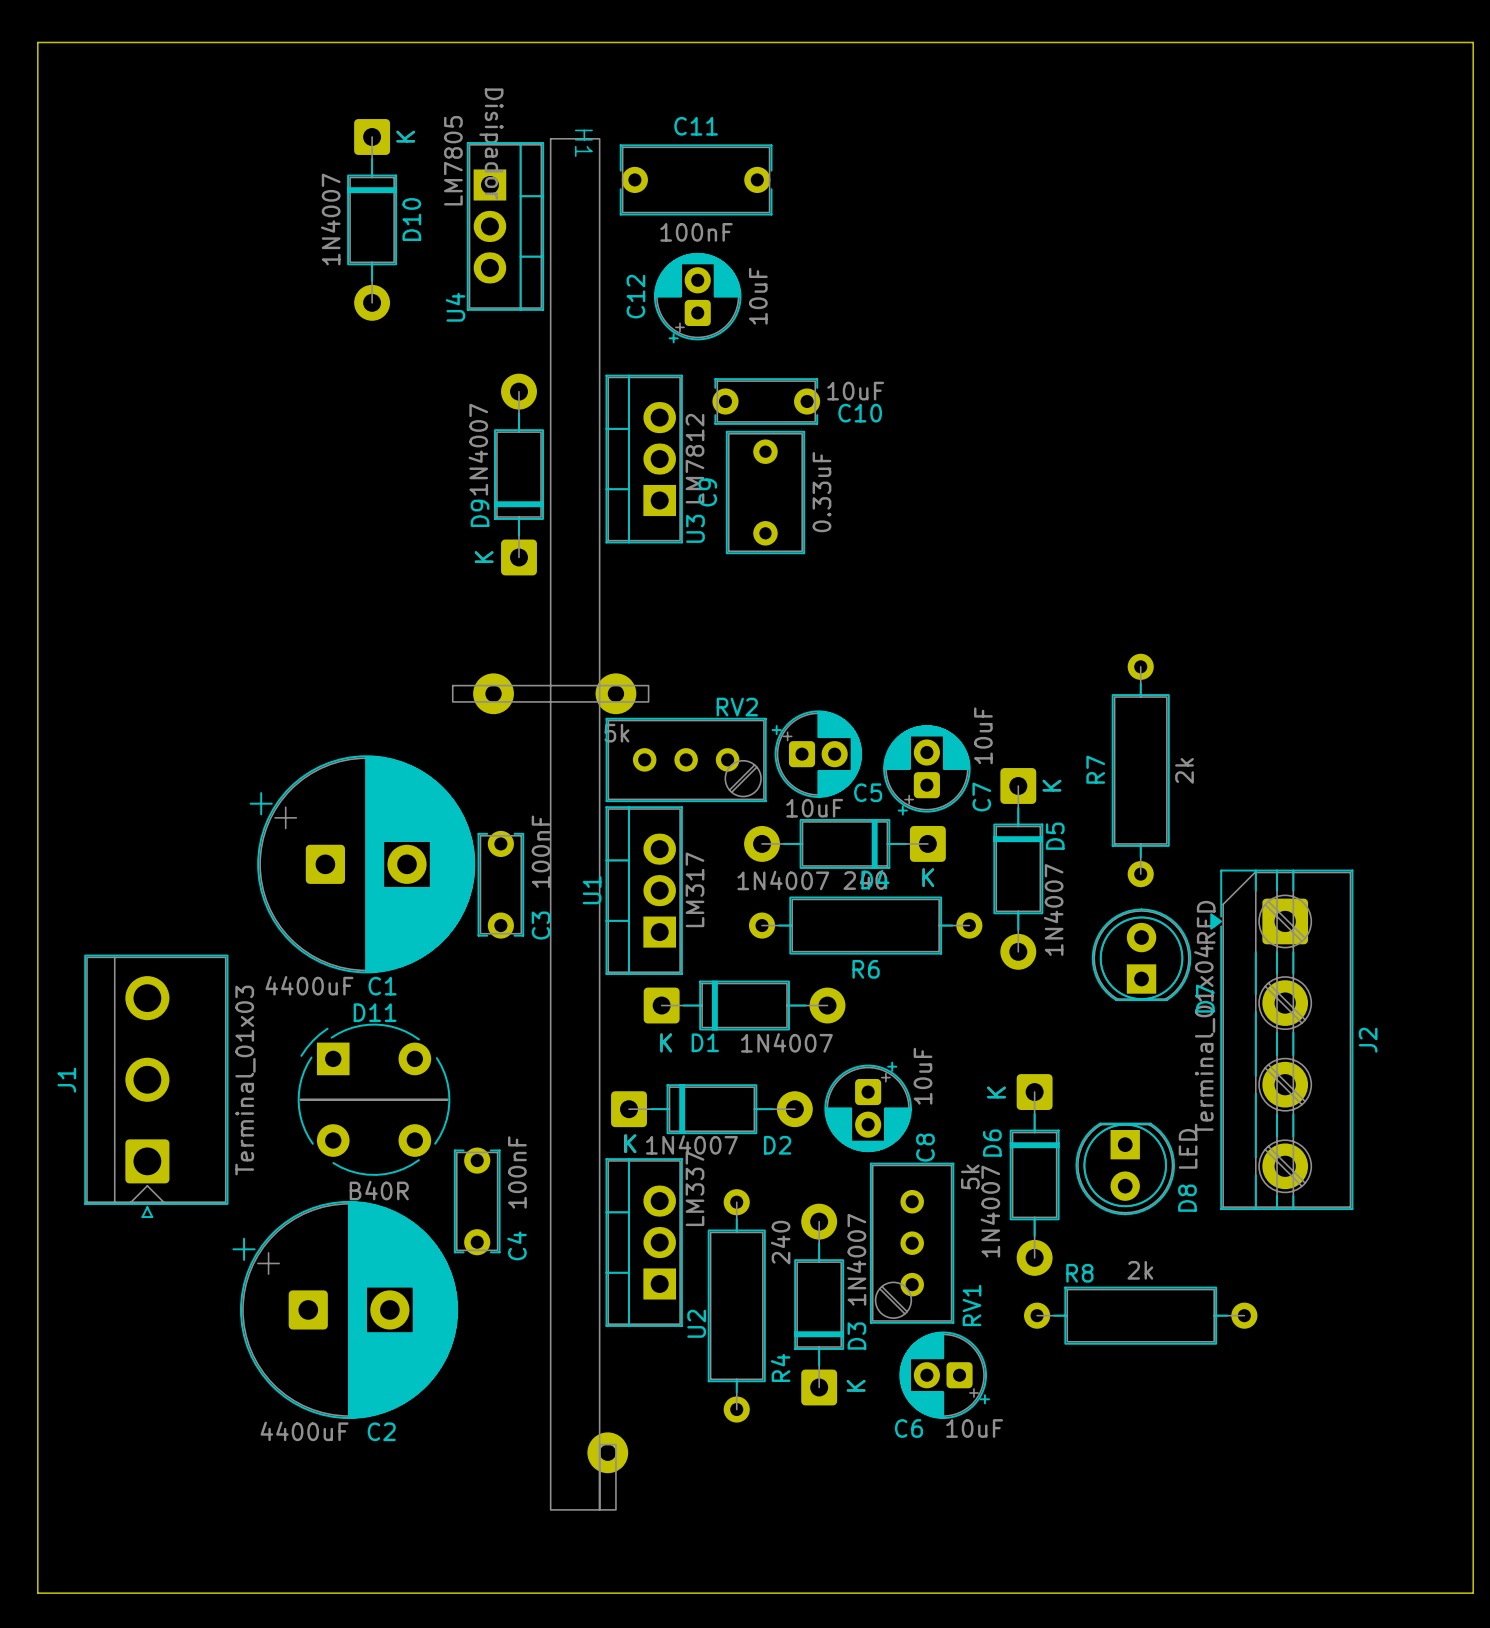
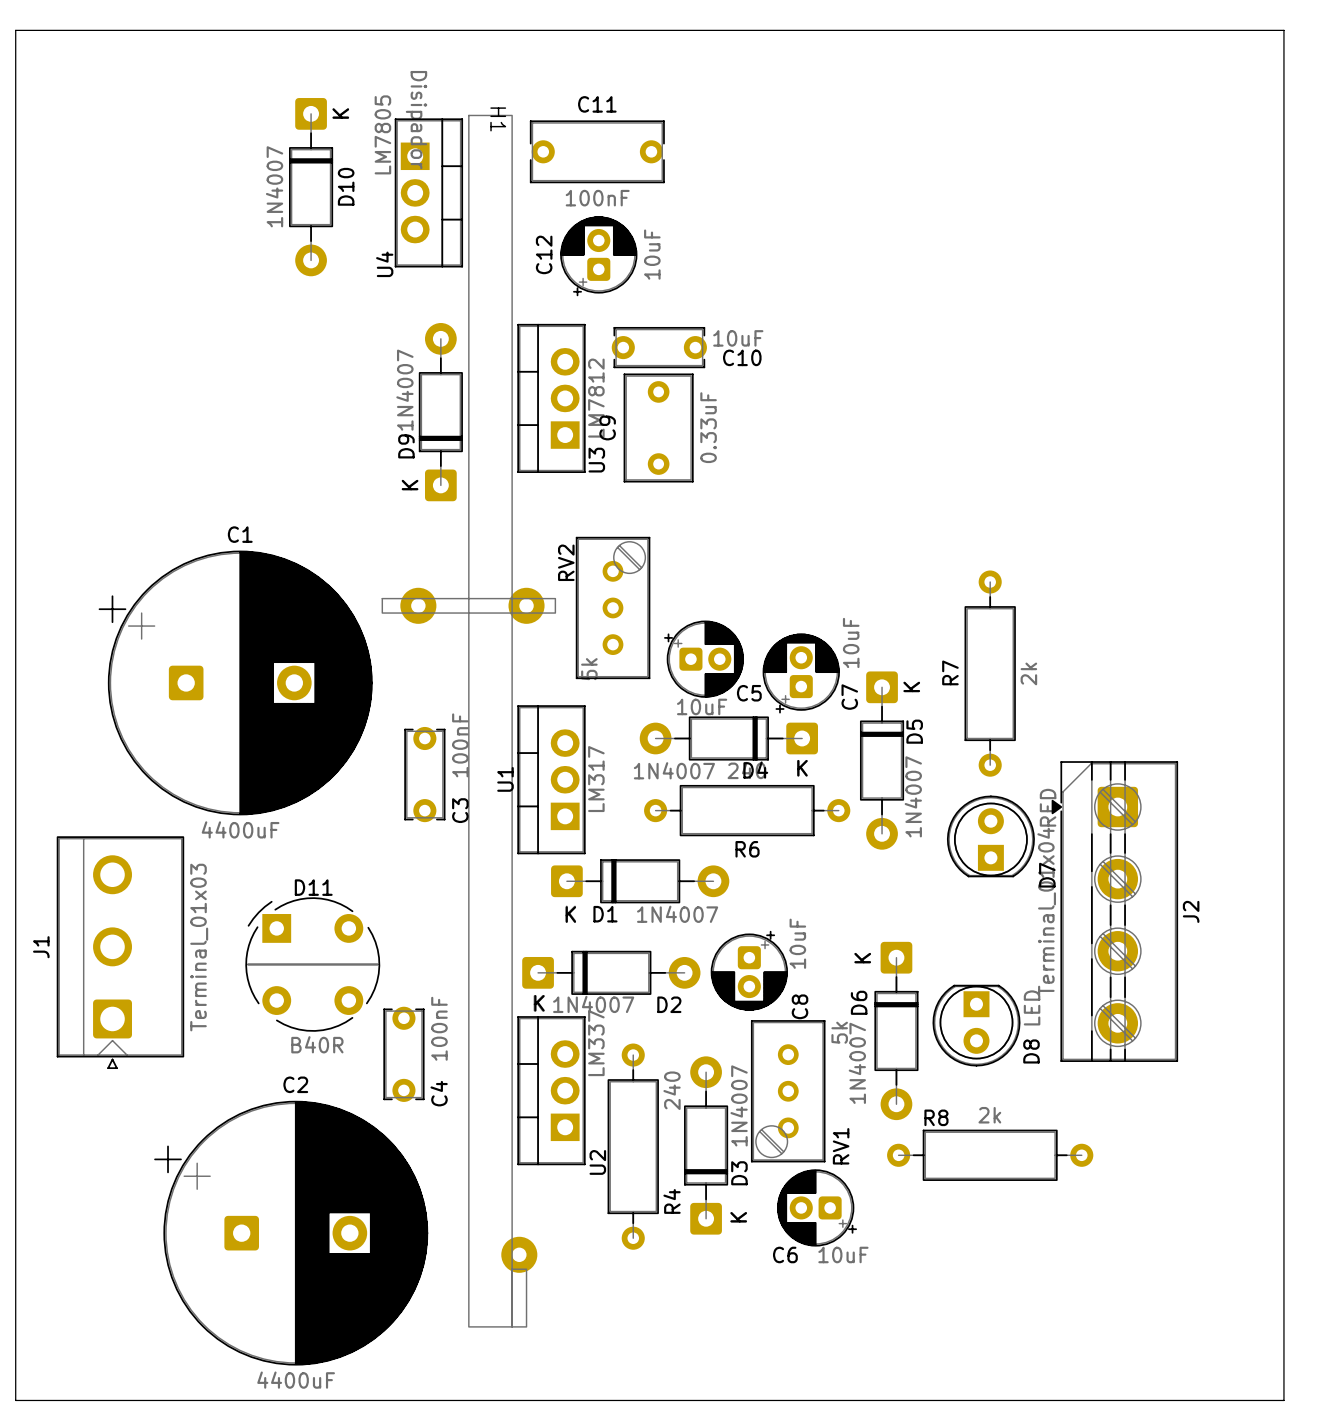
H1 footprint: [451, 137, 650, 1511] -> [381, 114, 557, 1328]
C1 footprint: [249, 755, 476, 974] -> [98, 550, 373, 816]
RV2 rotation: 0° (686, 759) -> 90° counterclockwise (613, 607)
C1 value position: 4400uF (309, 985) -> 4400uF (240, 829)
C1 name position: C1 (382, 986) -> C1 (240, 534)
C2 footprint: [232, 1200, 459, 1419] -> [154, 1100, 429, 1366]
C2 value position: 4400uF (304, 1431) -> 4400uF (296, 1380)
C2 name position: C2 (381, 1431) -> C2 (295, 1084)

